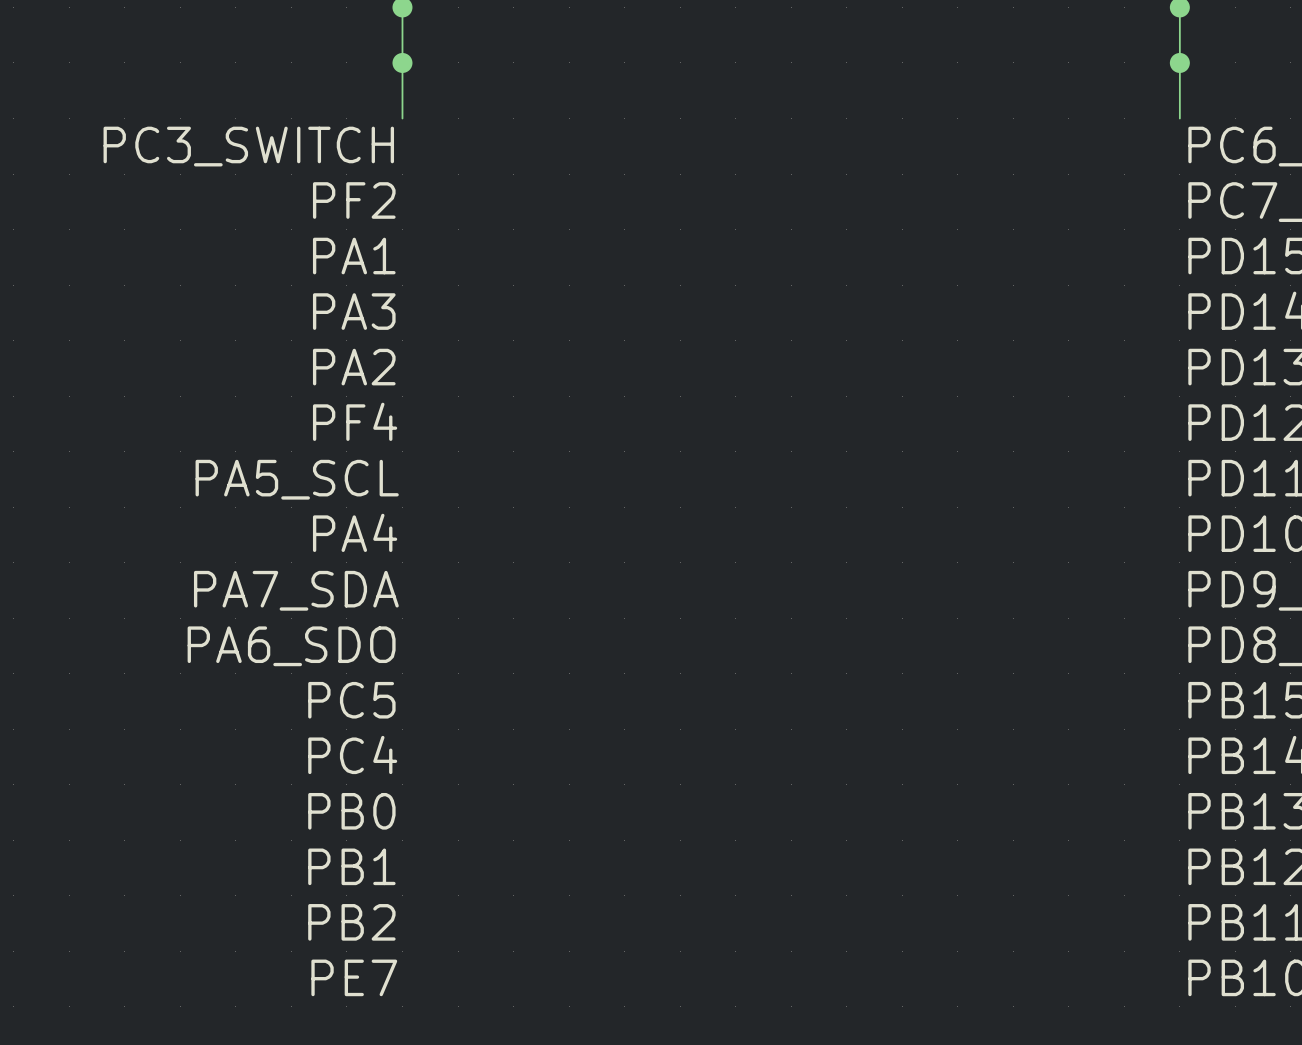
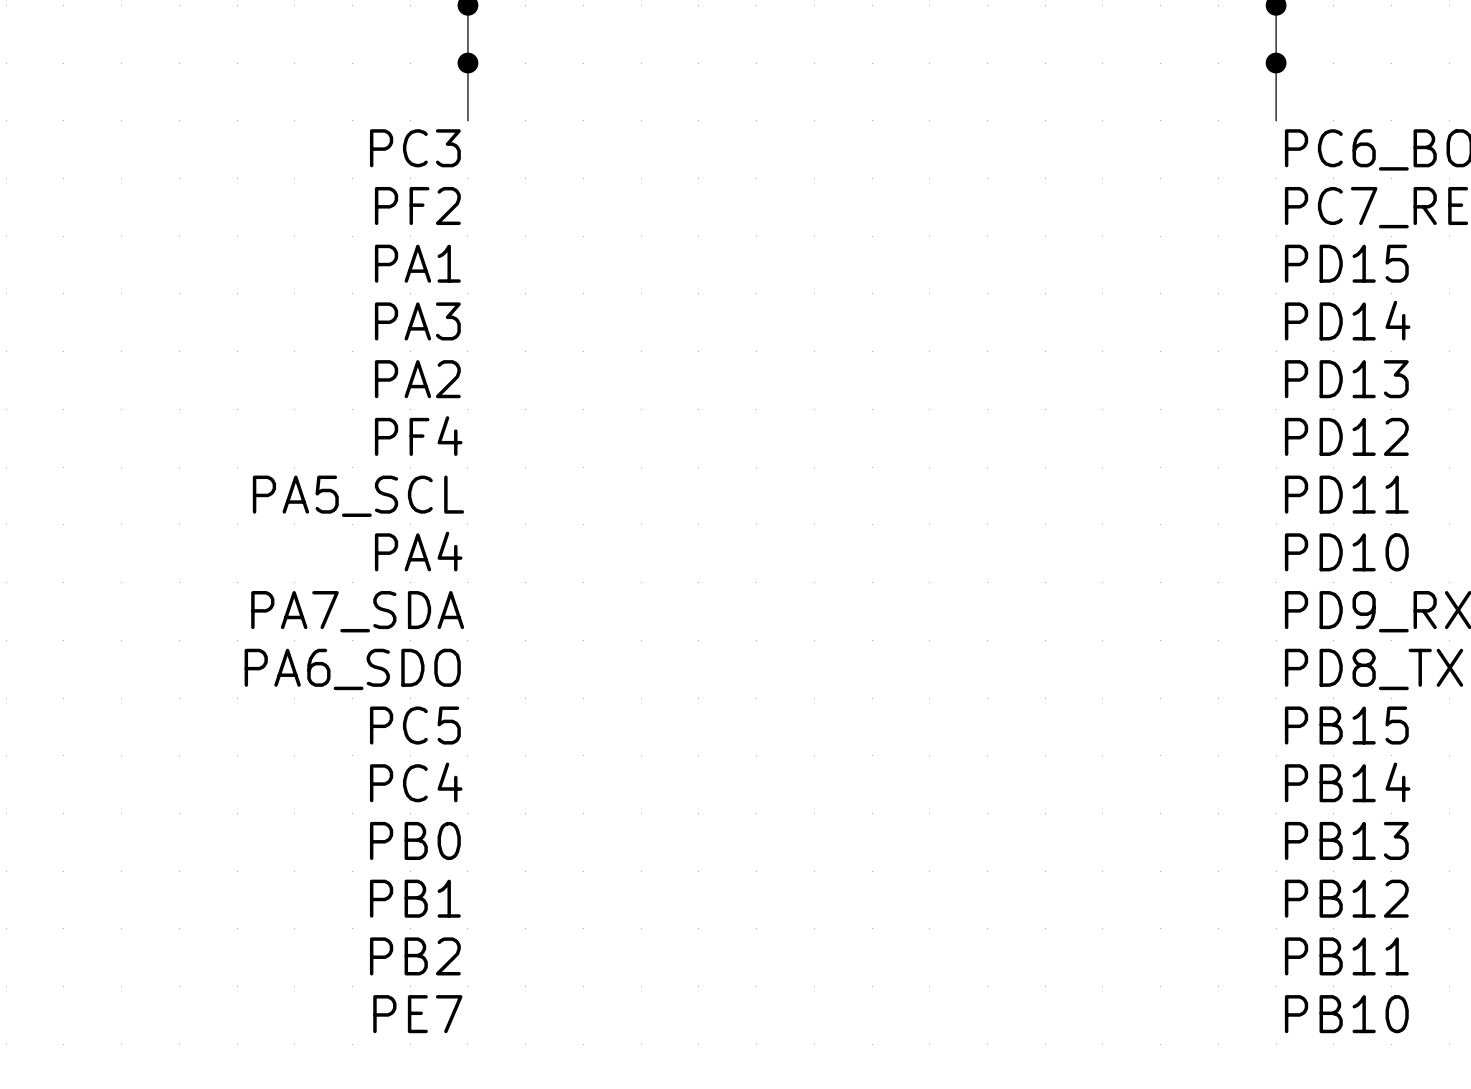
label: PC3_SWITCH (248, 146) -> PC3 (415, 148)

